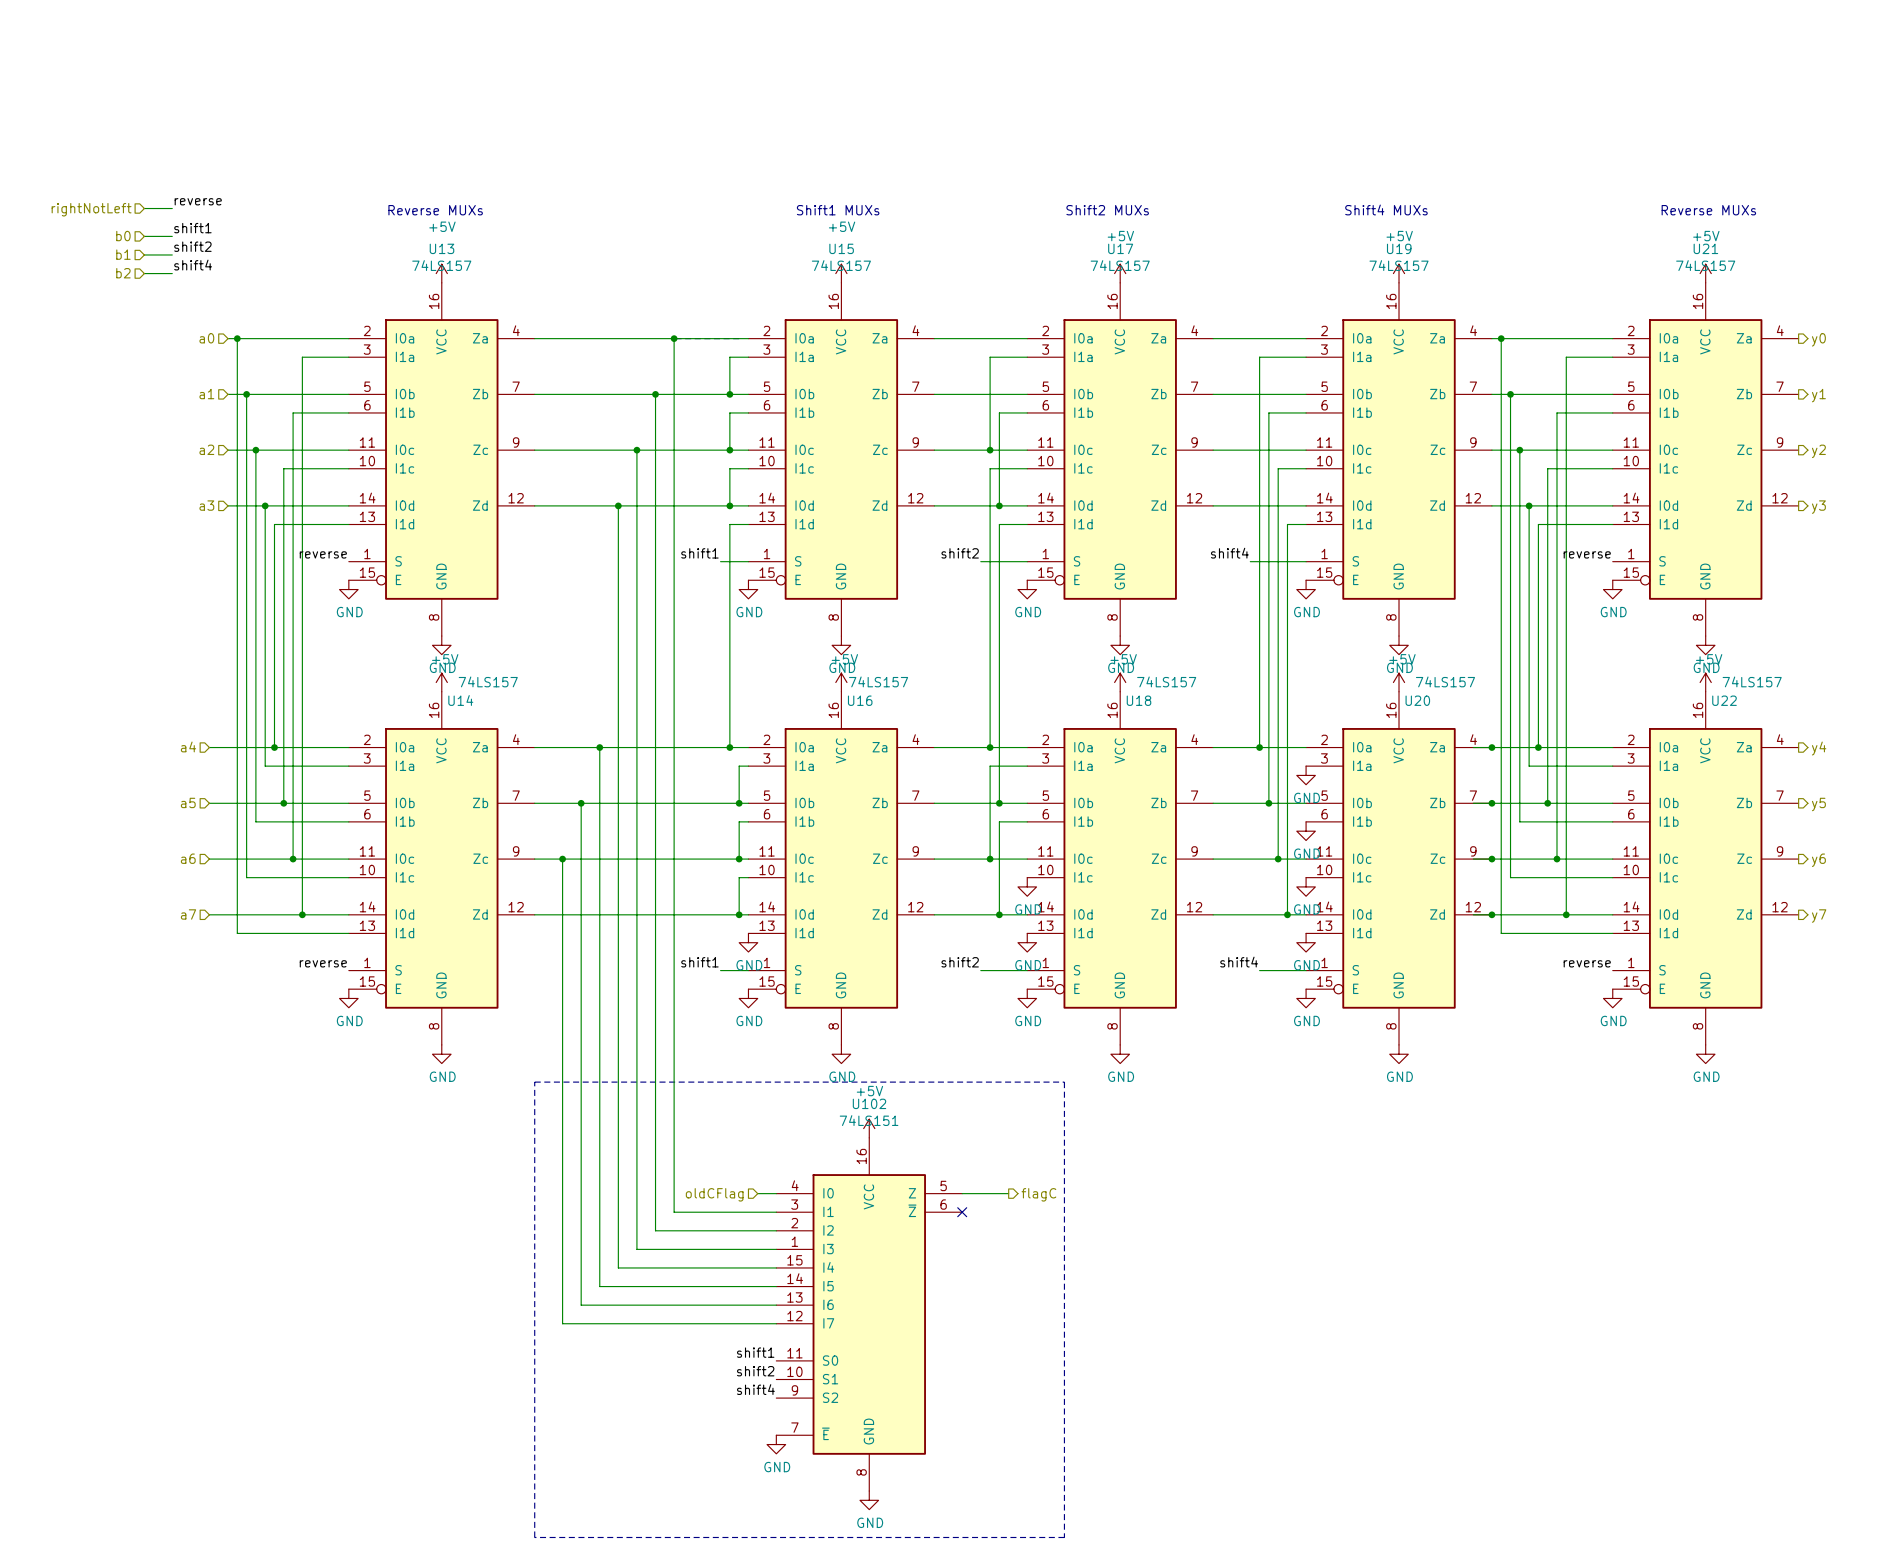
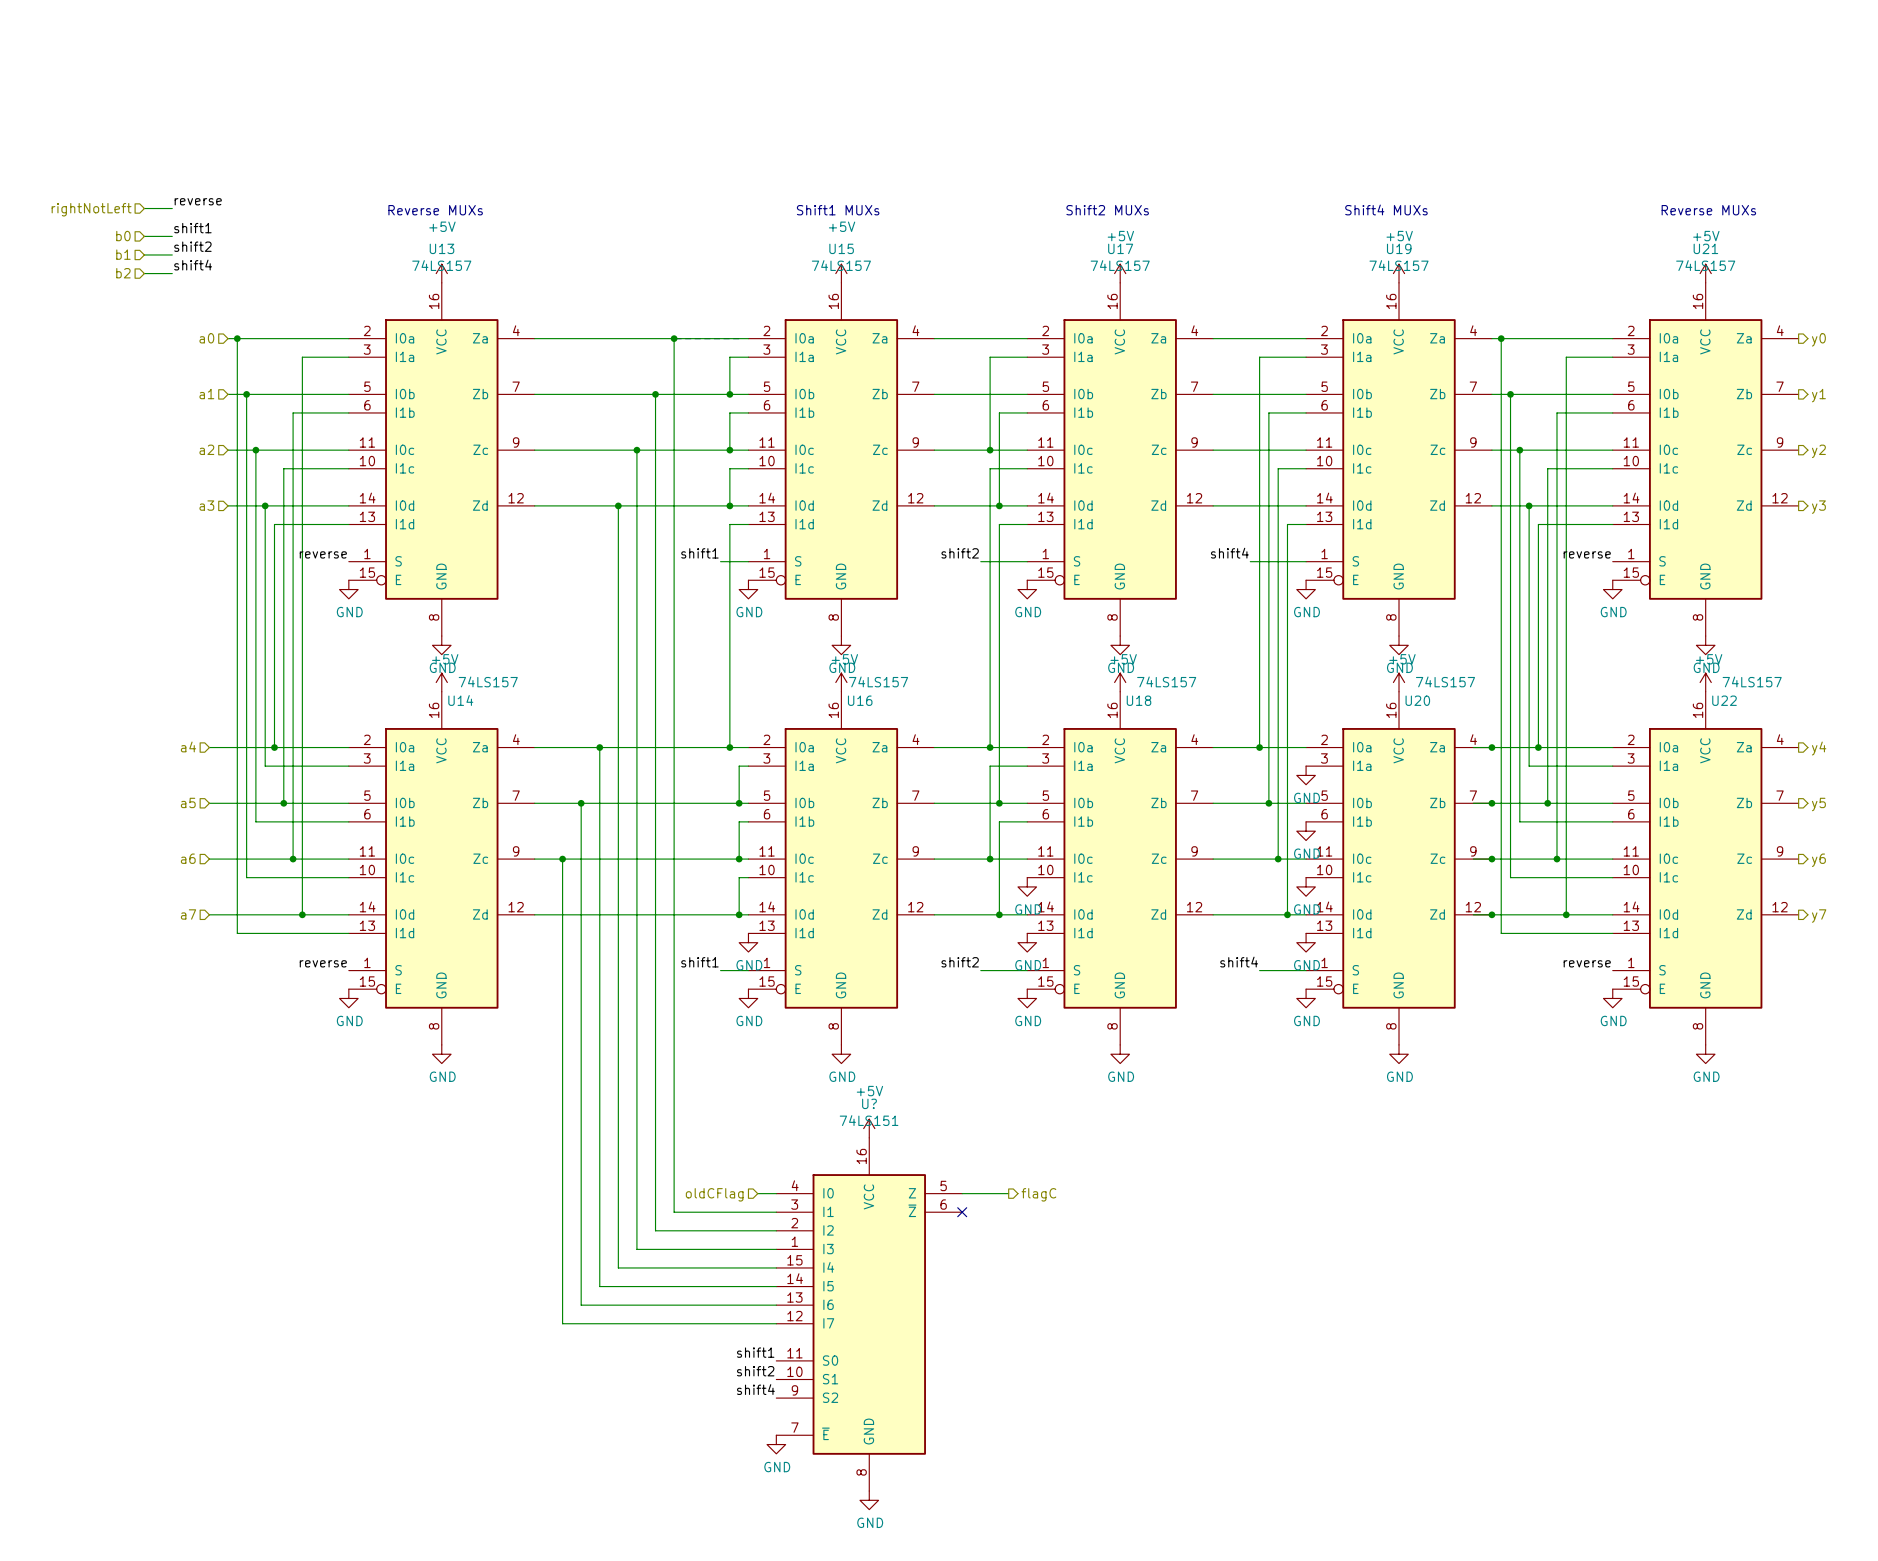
line: (534, 1082) (1064, 1082) (1064, 1537) (534, 1537) (534, 1082) -> none
U102 name: U102 (869, 1103) -> U? (869, 1103)

